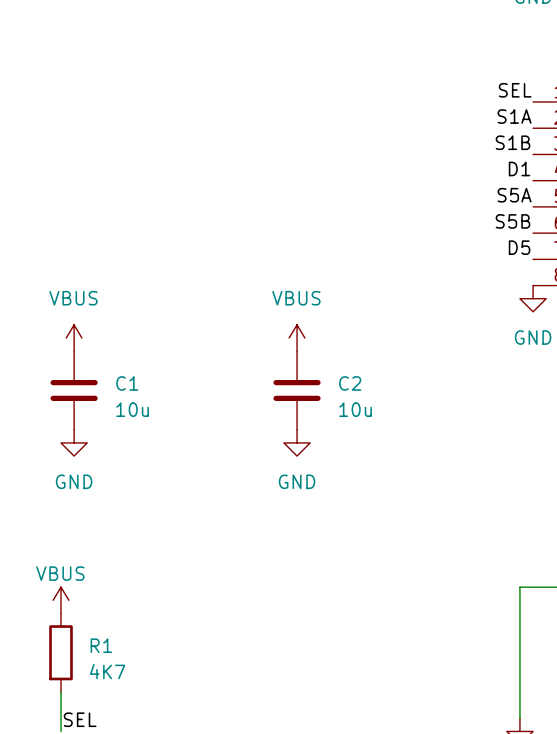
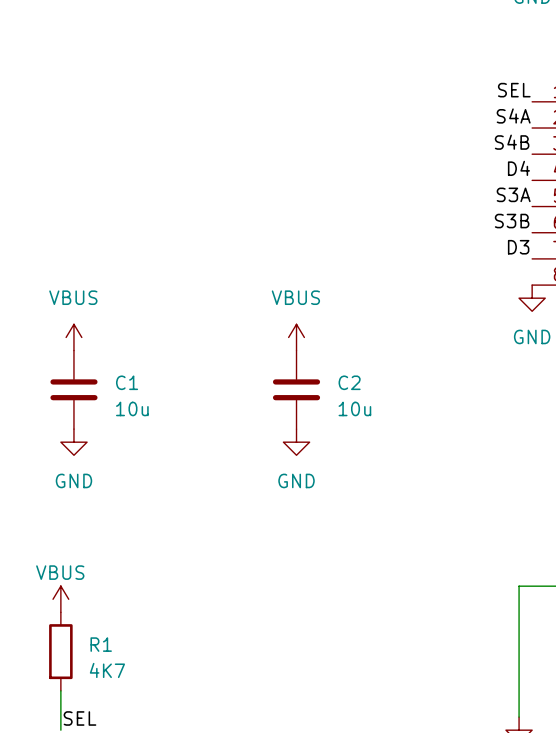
label: S1A (514, 116) -> S4A (513, 116)
label: S1B (512, 142) -> S4B (512, 142)
label: D1 (519, 168) -> D4 (518, 168)
label: S5A (514, 195) -> S3A (513, 194)
label: S5B (512, 221) -> S3B (512, 221)
label: D5 (519, 247) -> D3 (518, 247)

